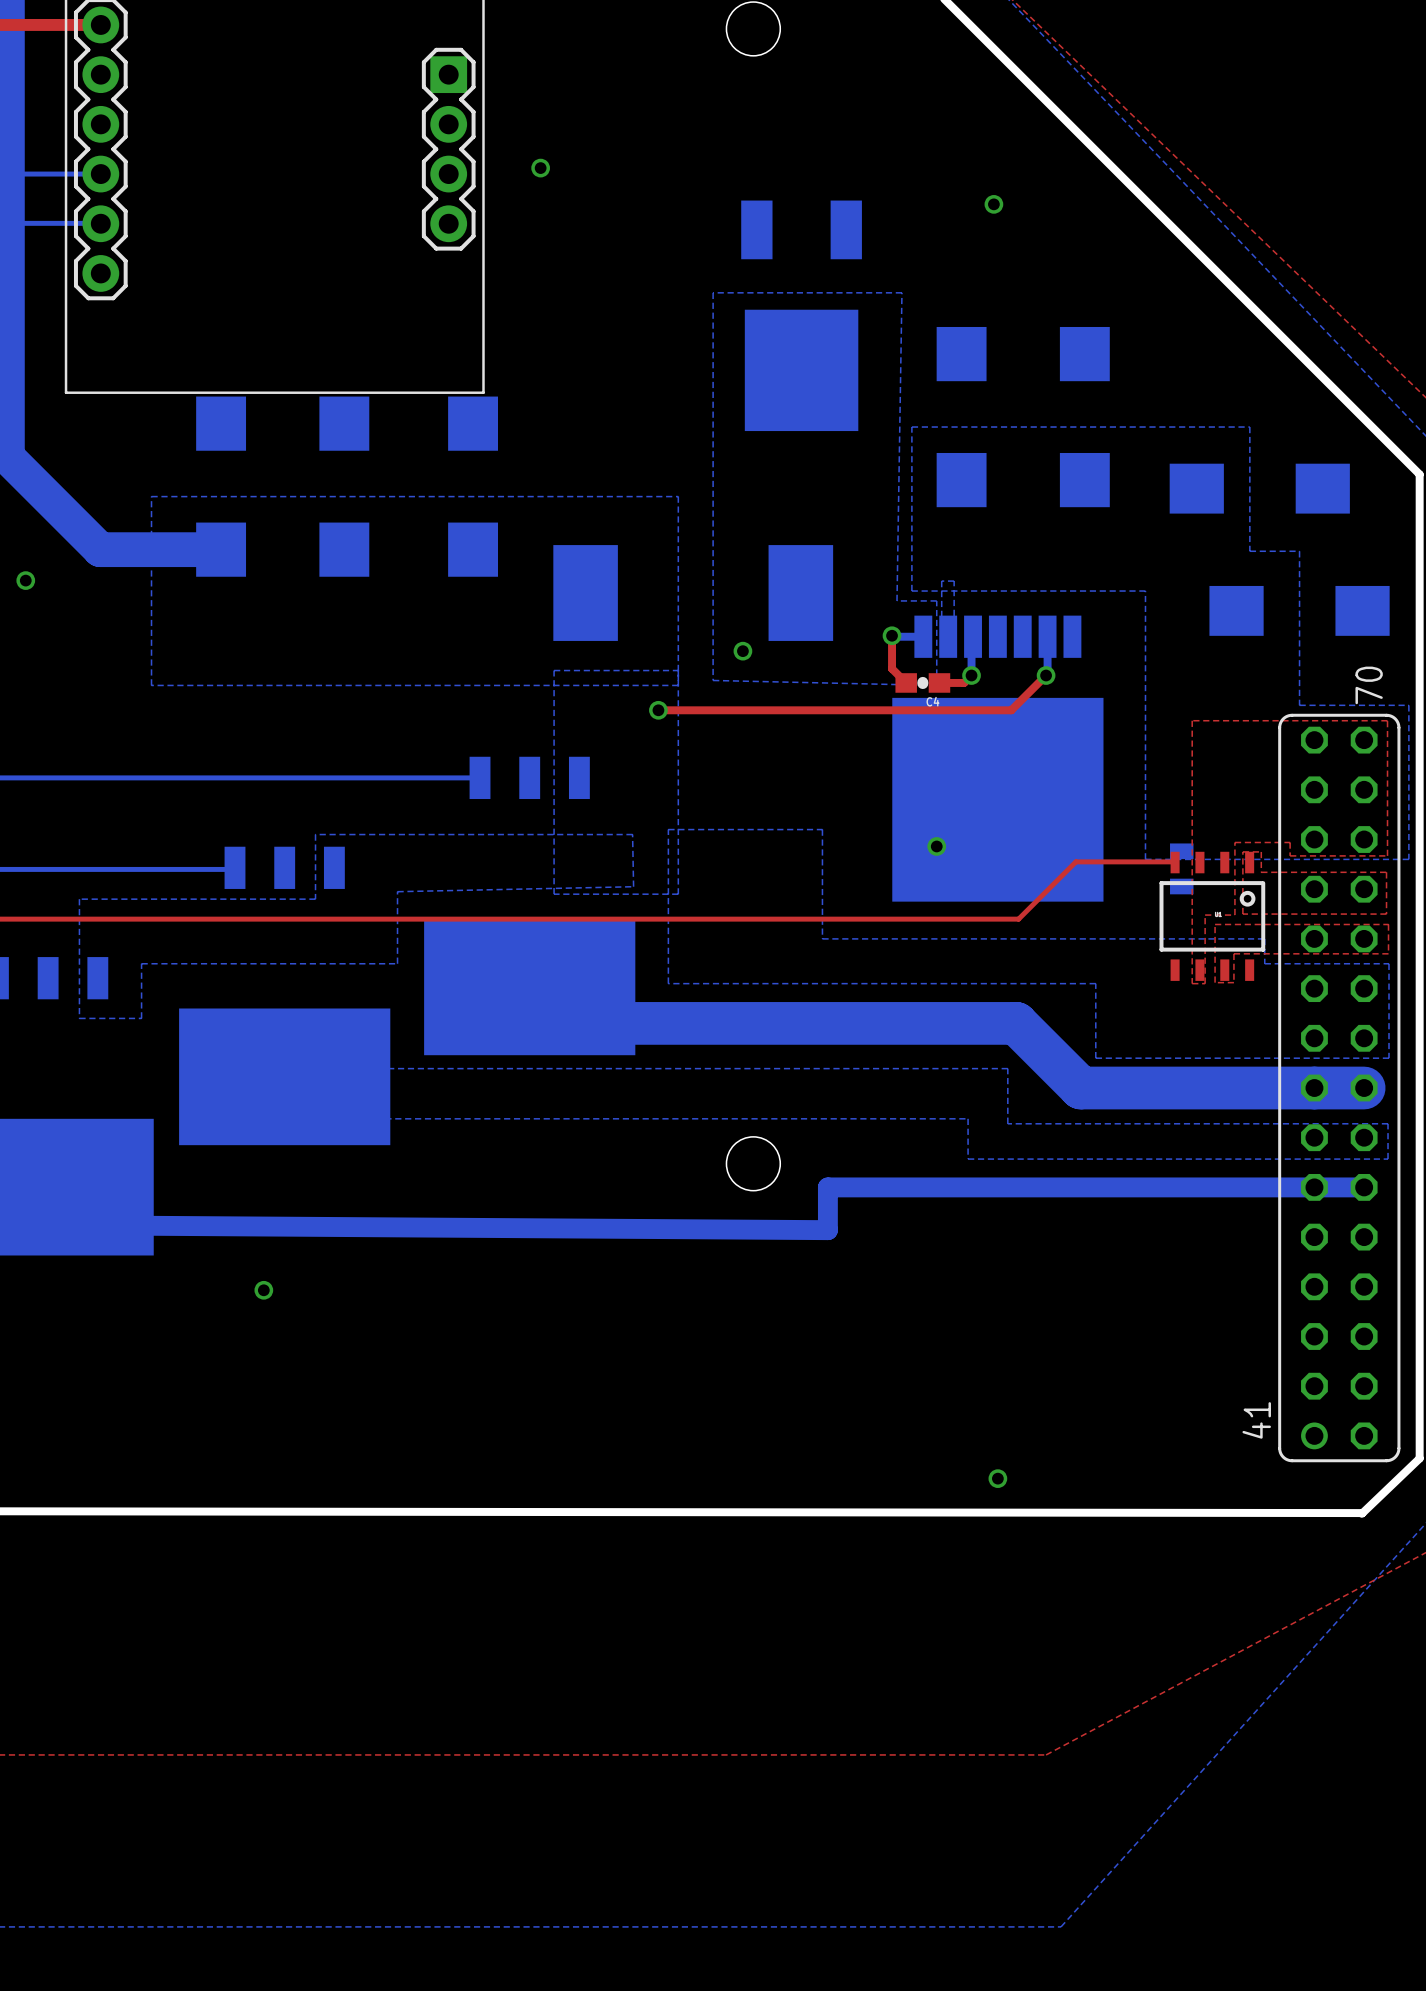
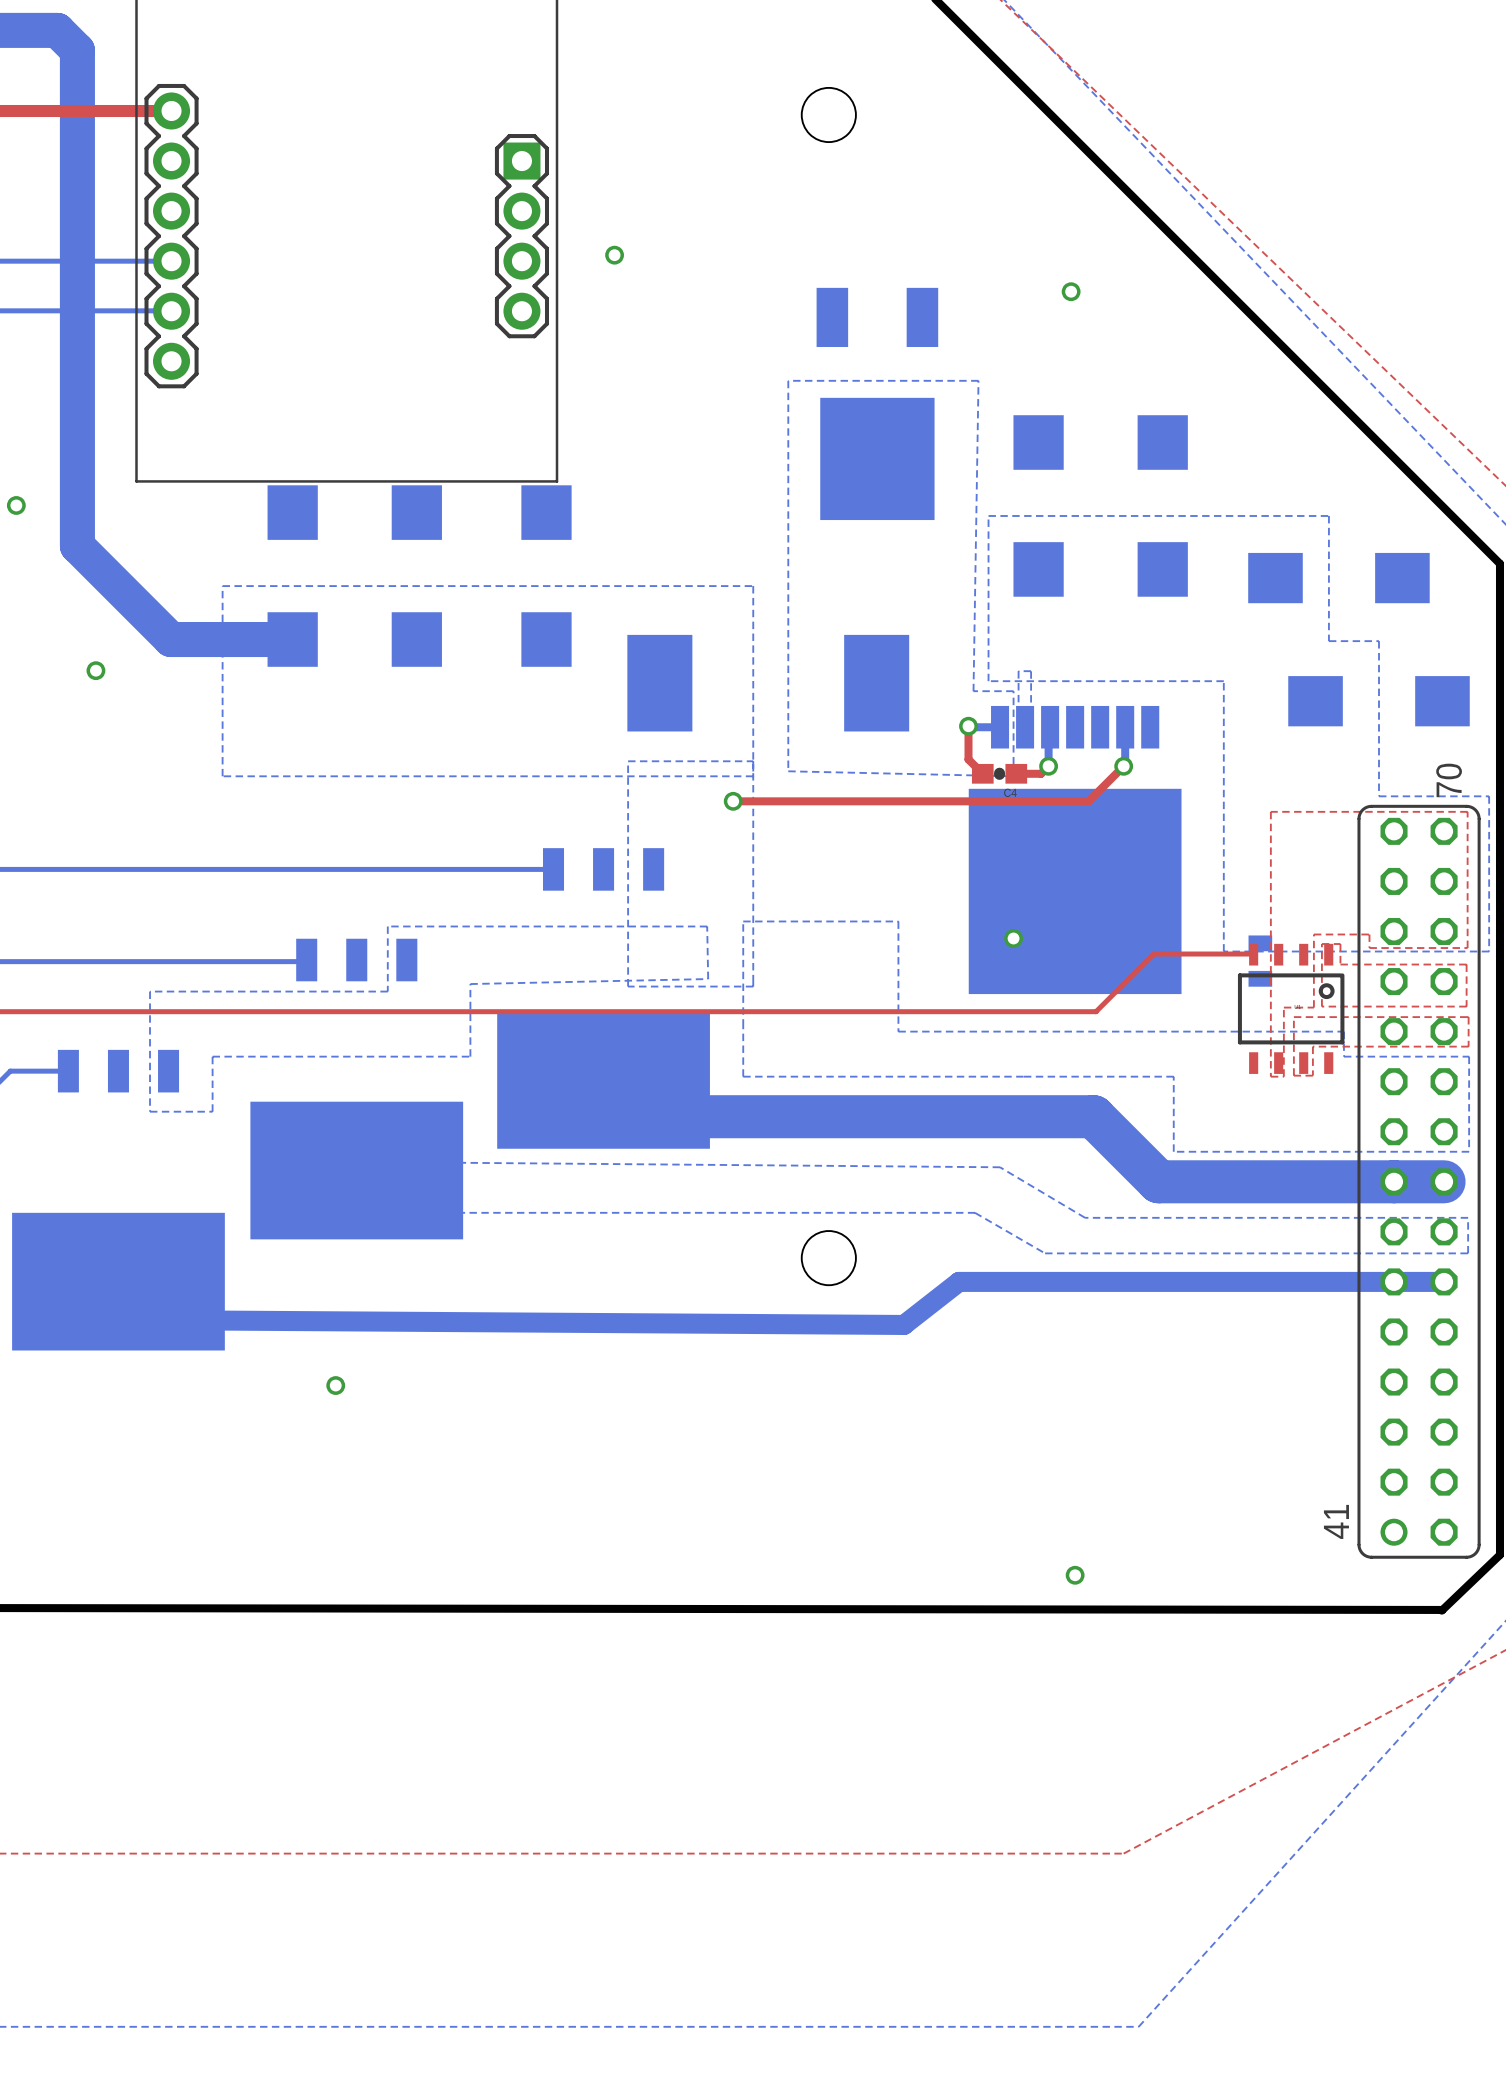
via: (742, 651) -> none
bottom zone outline: (325, 1068) (1007, 1068) (1007, 1123) -> (398, 1162) (1000, 1167) (1085, 1217)
bottom zone outline: (898, 1118) (968, 1118) (968, 1159) -> (975, 1212) (1045, 1253)
bottom track: (882, 1187) (827, 1187) (827, 1230) -> (958, 1281) (903, 1324)

